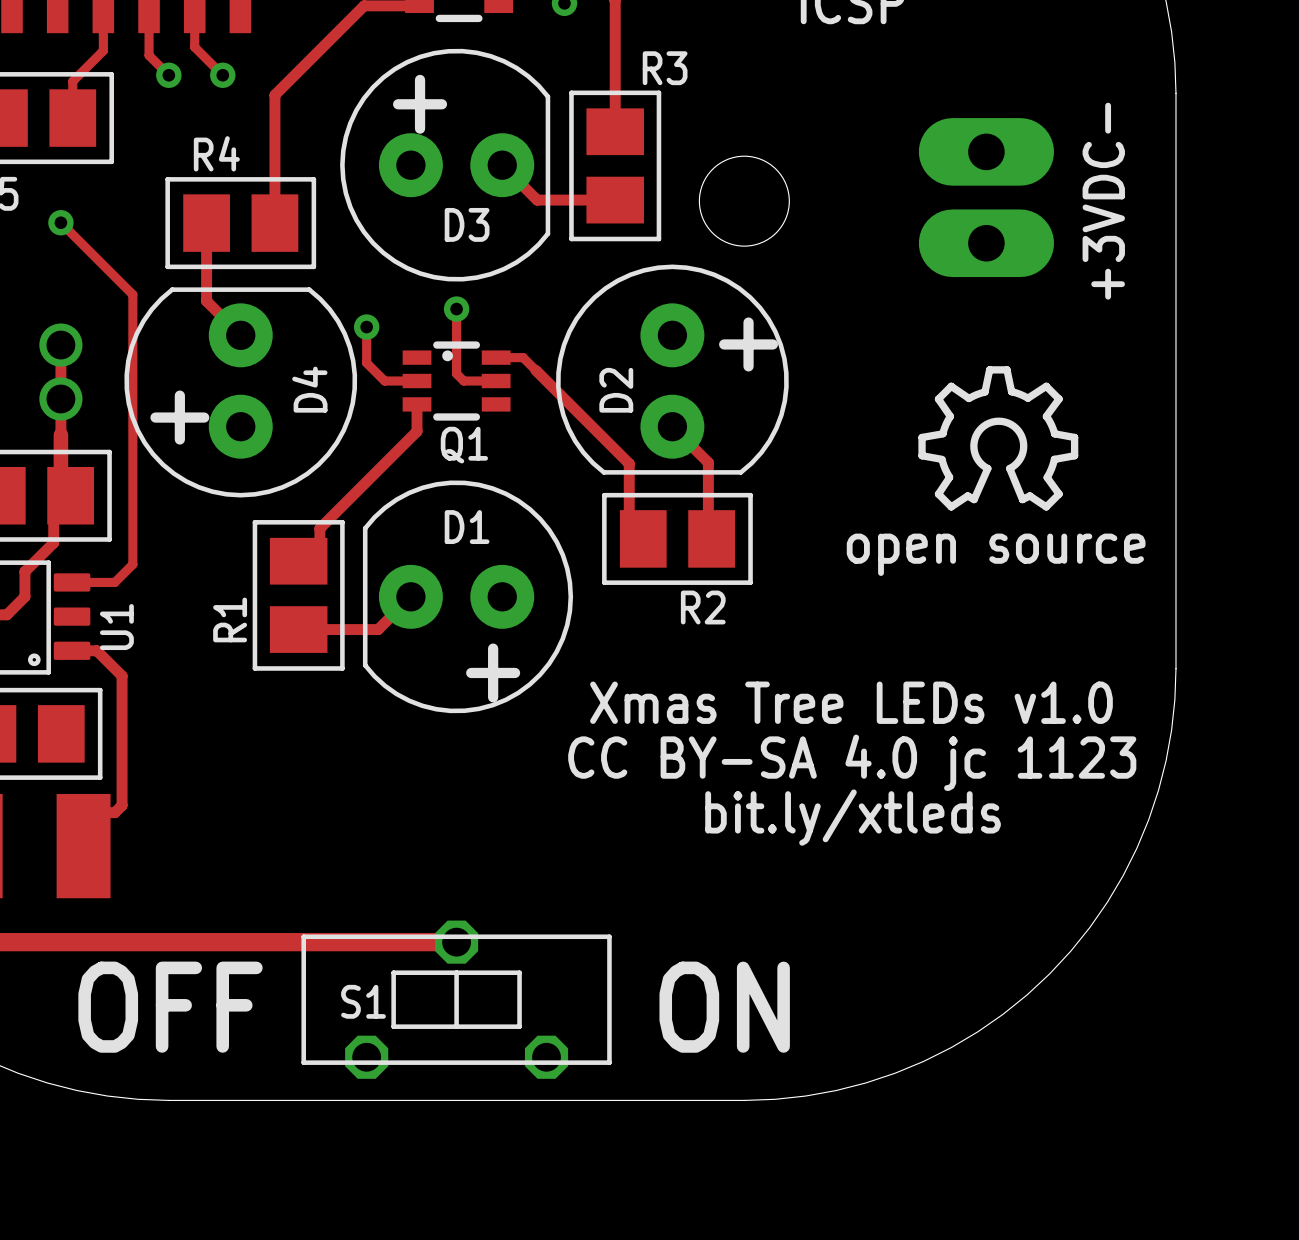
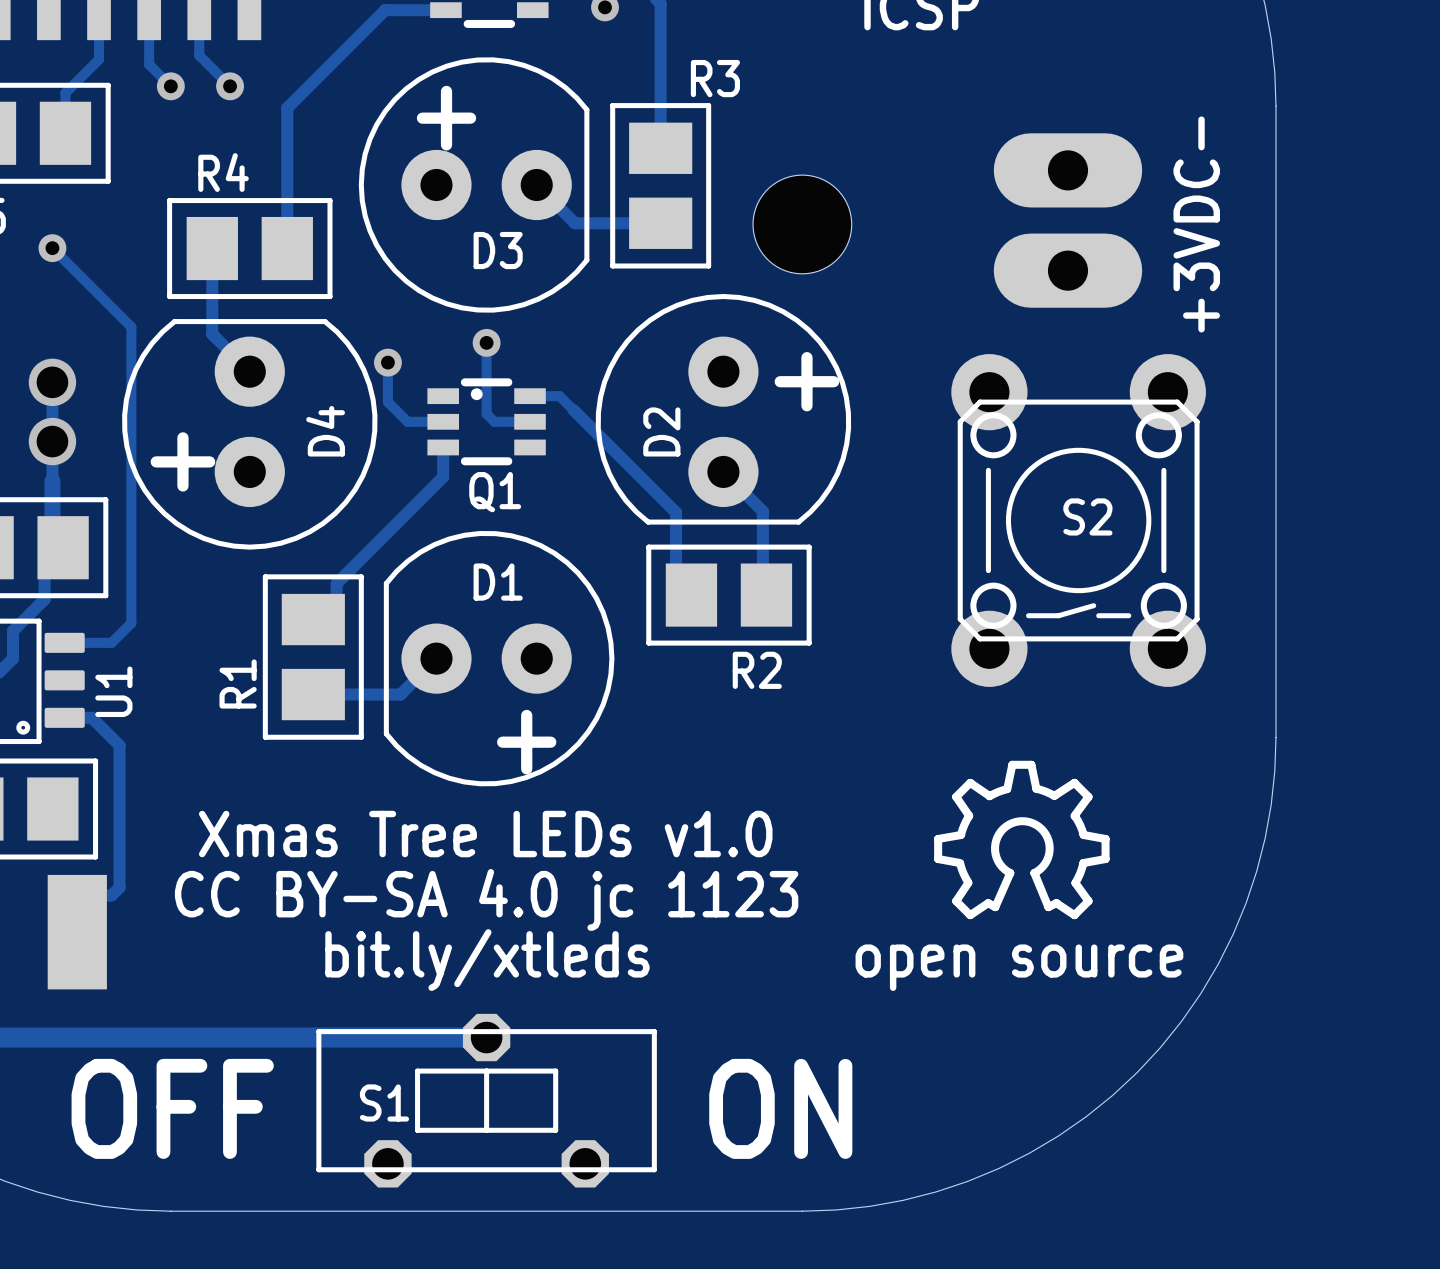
drawing position: (998, 438) -> (1021, 839)
S2: none -> (1078, 520)
text position: open source (996, 554) -> open source (1019, 967)
text position: Xmas Tree LEDs v1.0 (851, 702) -> Xmas Tree LEDs v1.0 (485, 834)
text position: CC BY-SA 4.0 jc 1123 (852, 762) -> CC BY-SA 4.0 jc 1123 (486, 899)
text position: bit.ly/xtleds (853, 817) -> bit.ly/xtleds (487, 960)

